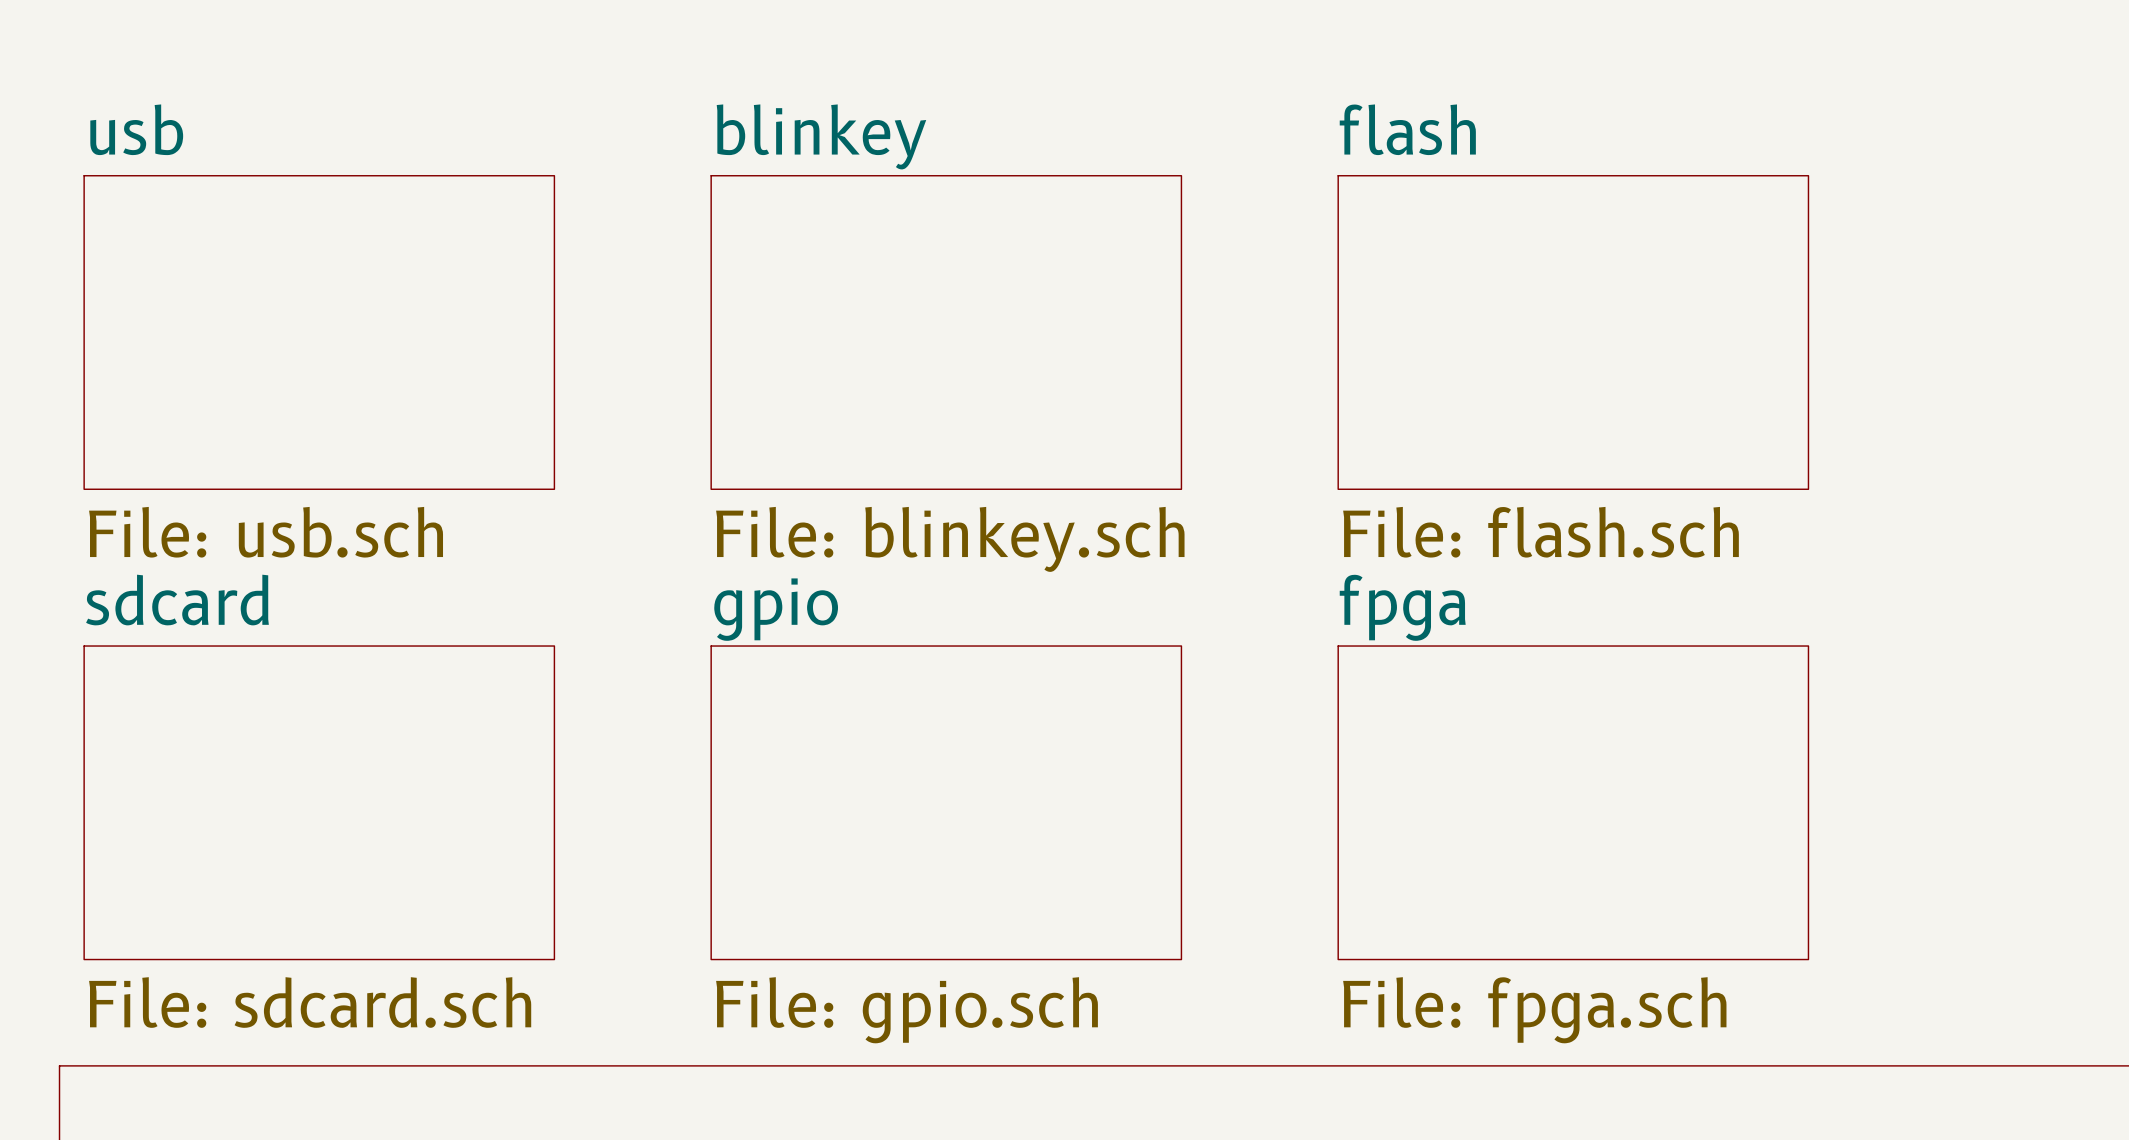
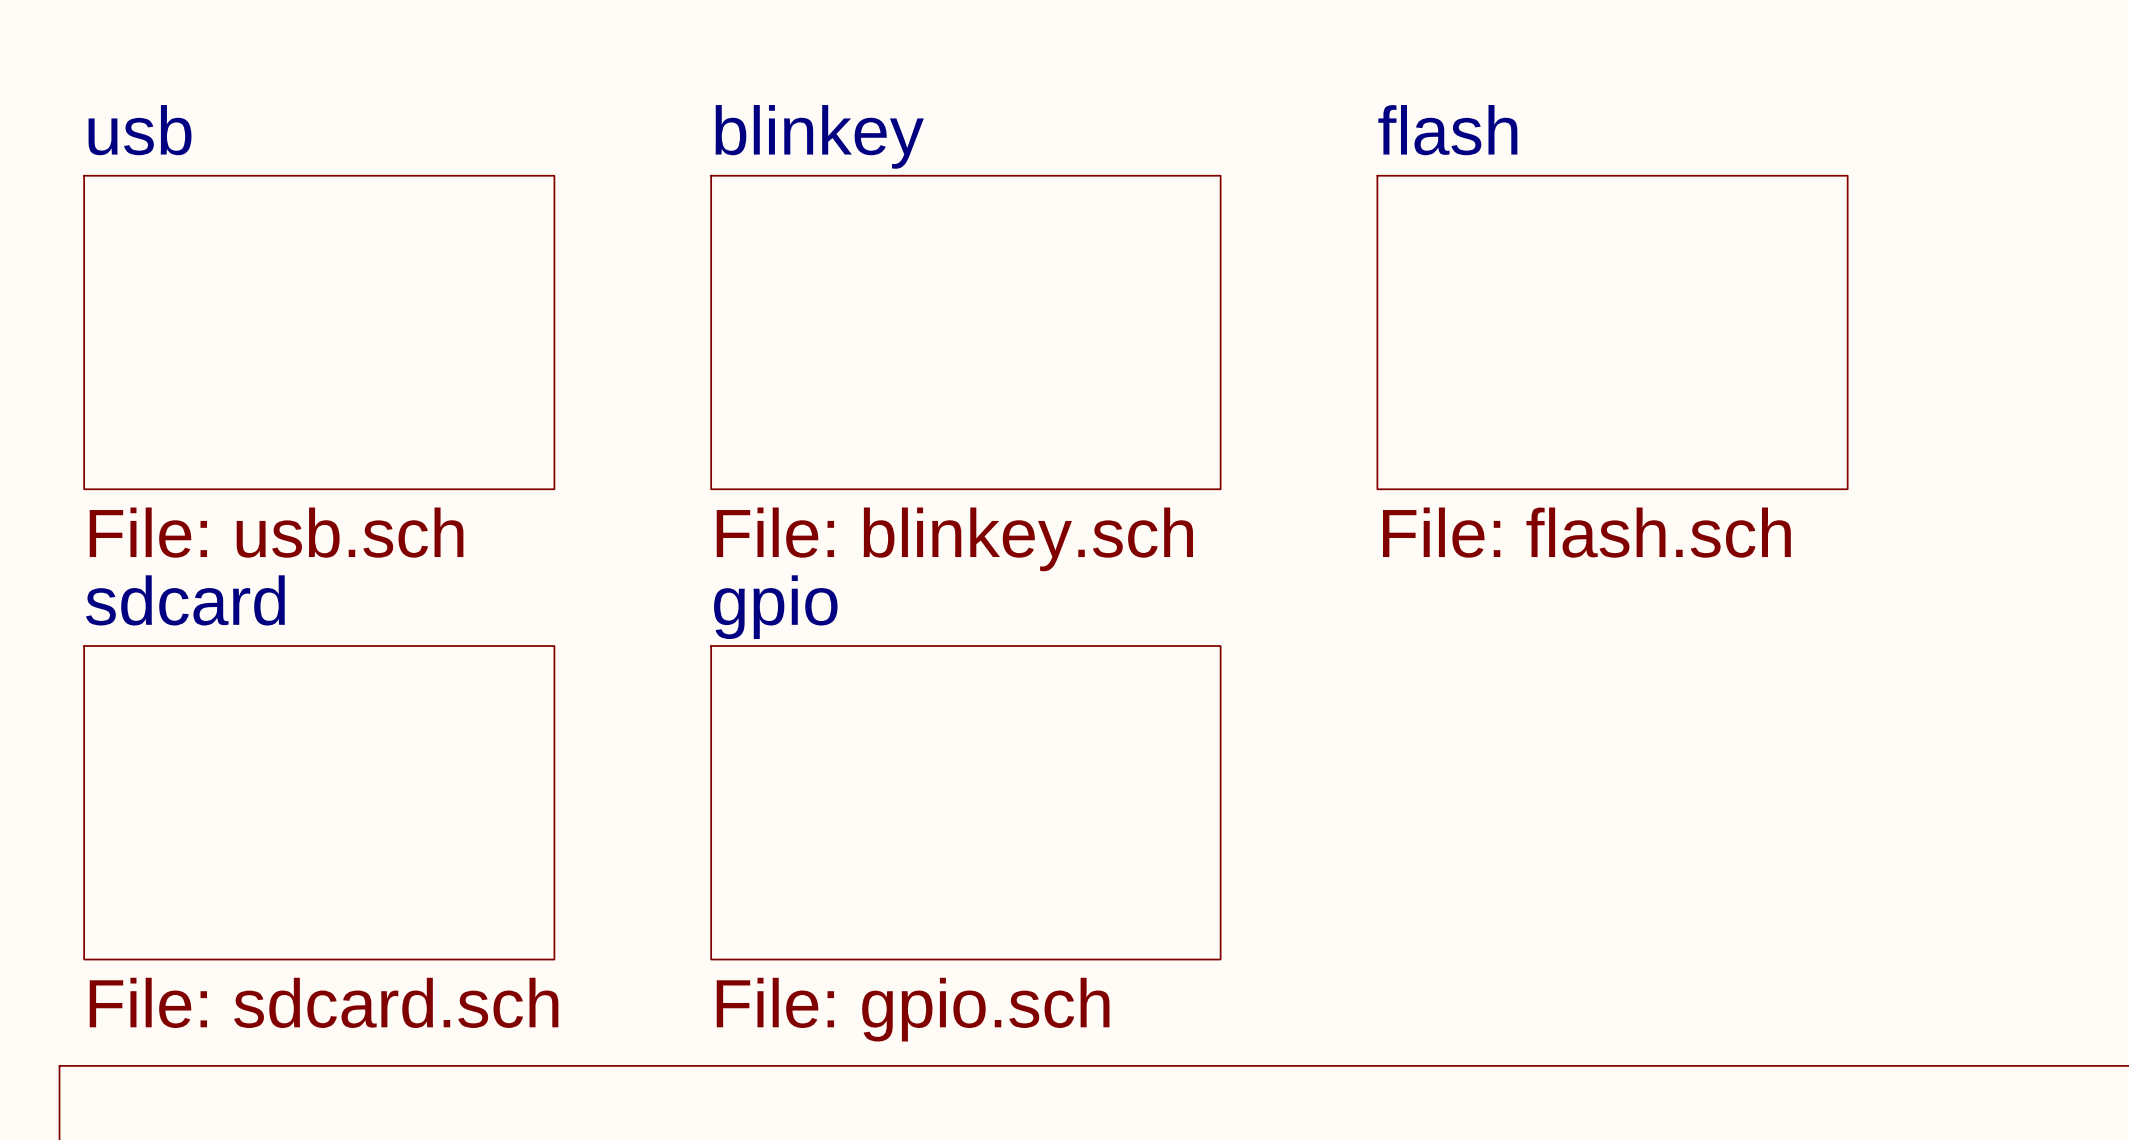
sheet blinkey shape: [711, 175, 1182, 490] -> [711, 175, 1221, 490]
sheet flash position: (1573, 332) -> (1612, 332)
sheet gpio shape: [711, 646, 1182, 960] -> [711, 646, 1221, 960]
sheet fpga: File: fpga.sch (1573, 802) -> none

